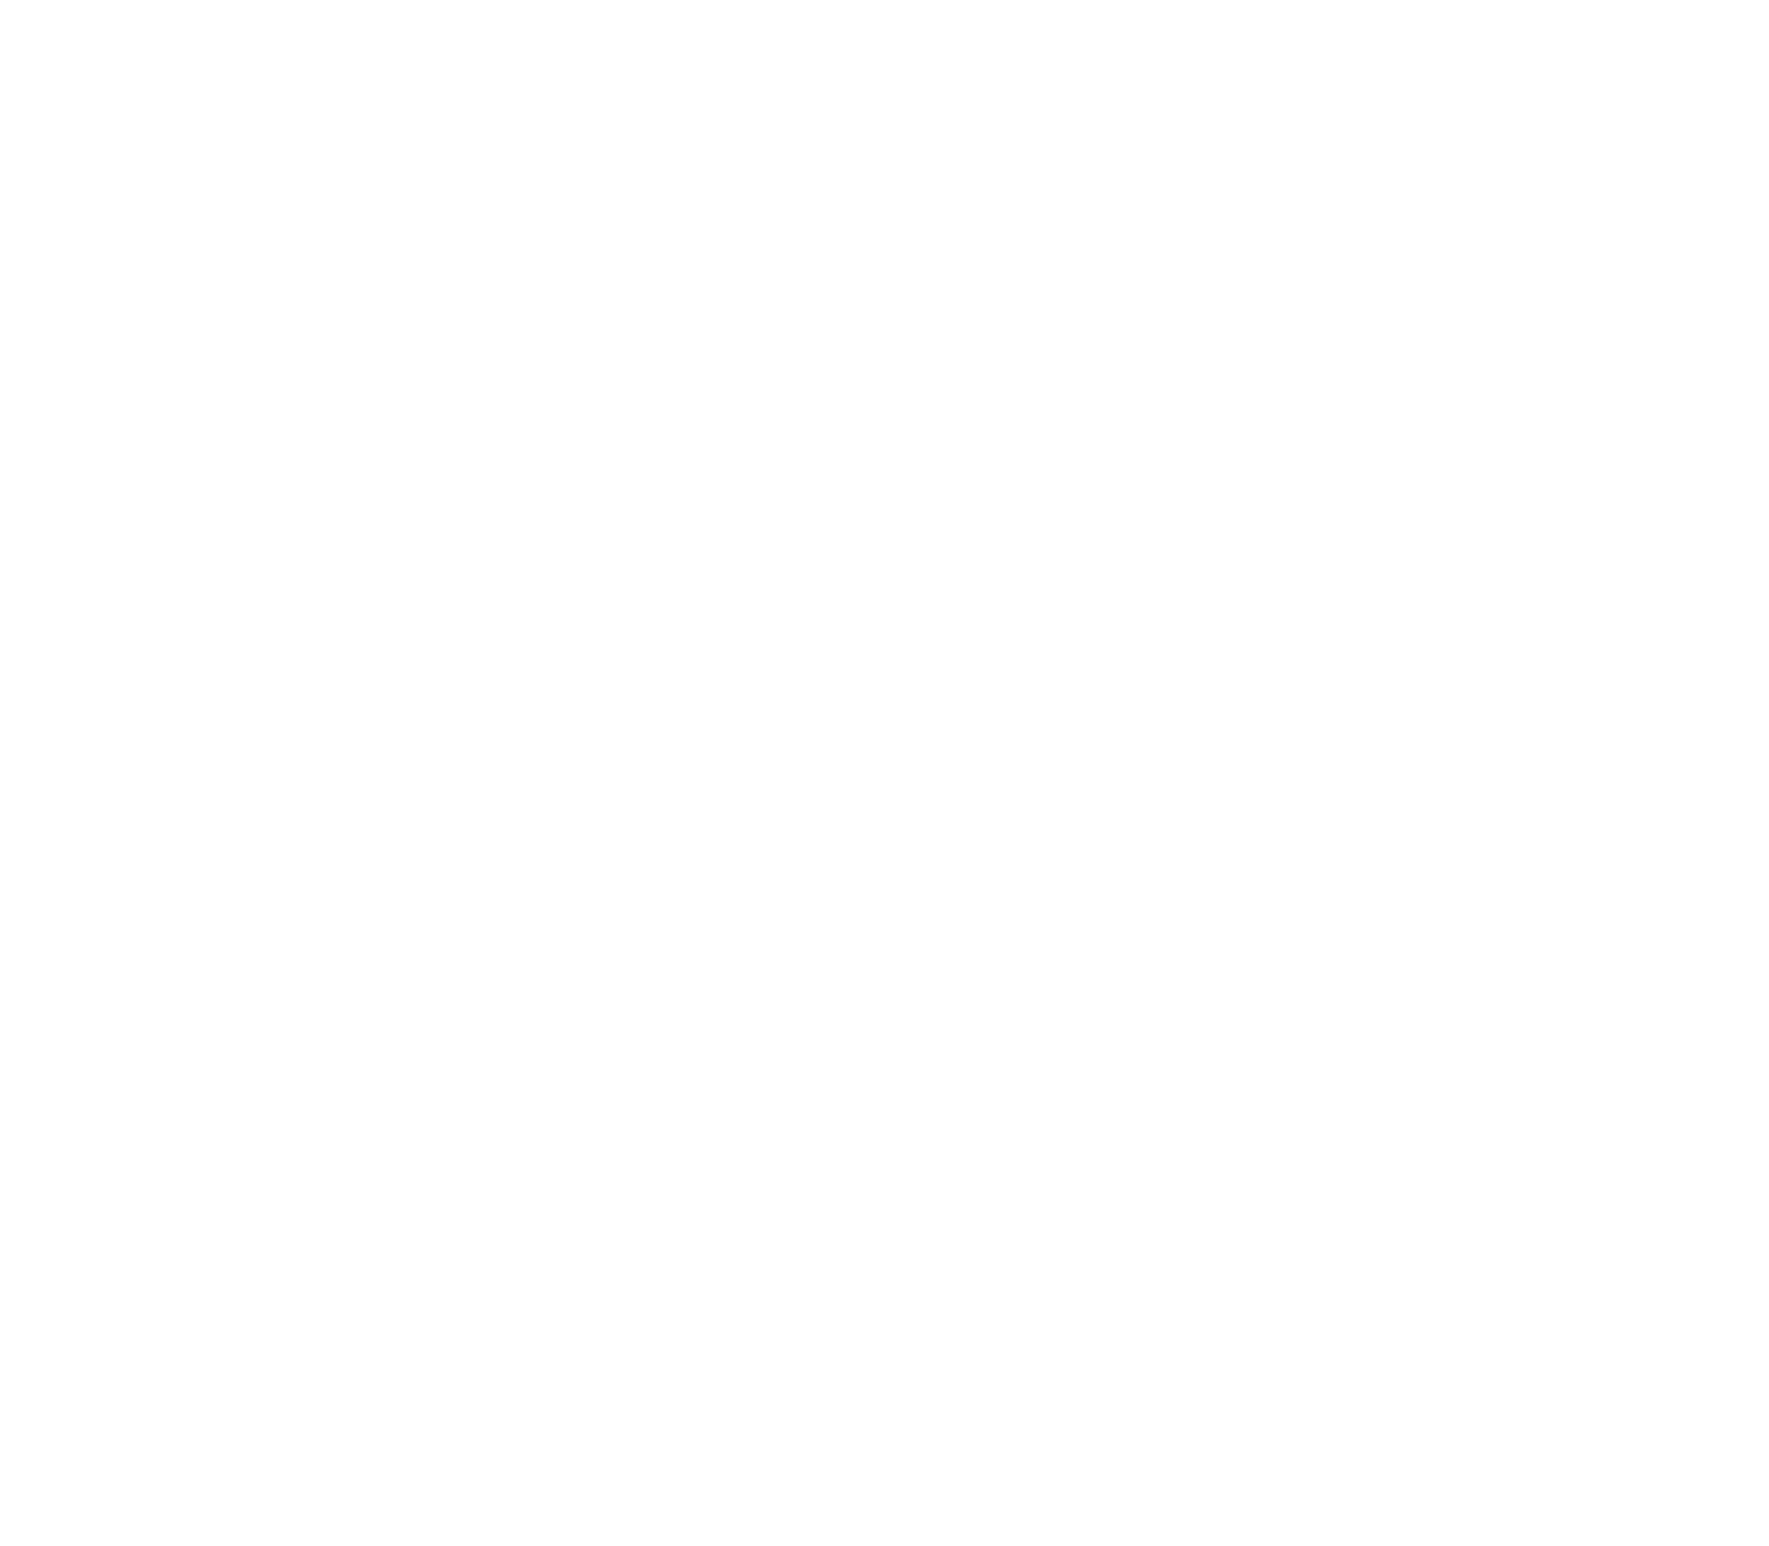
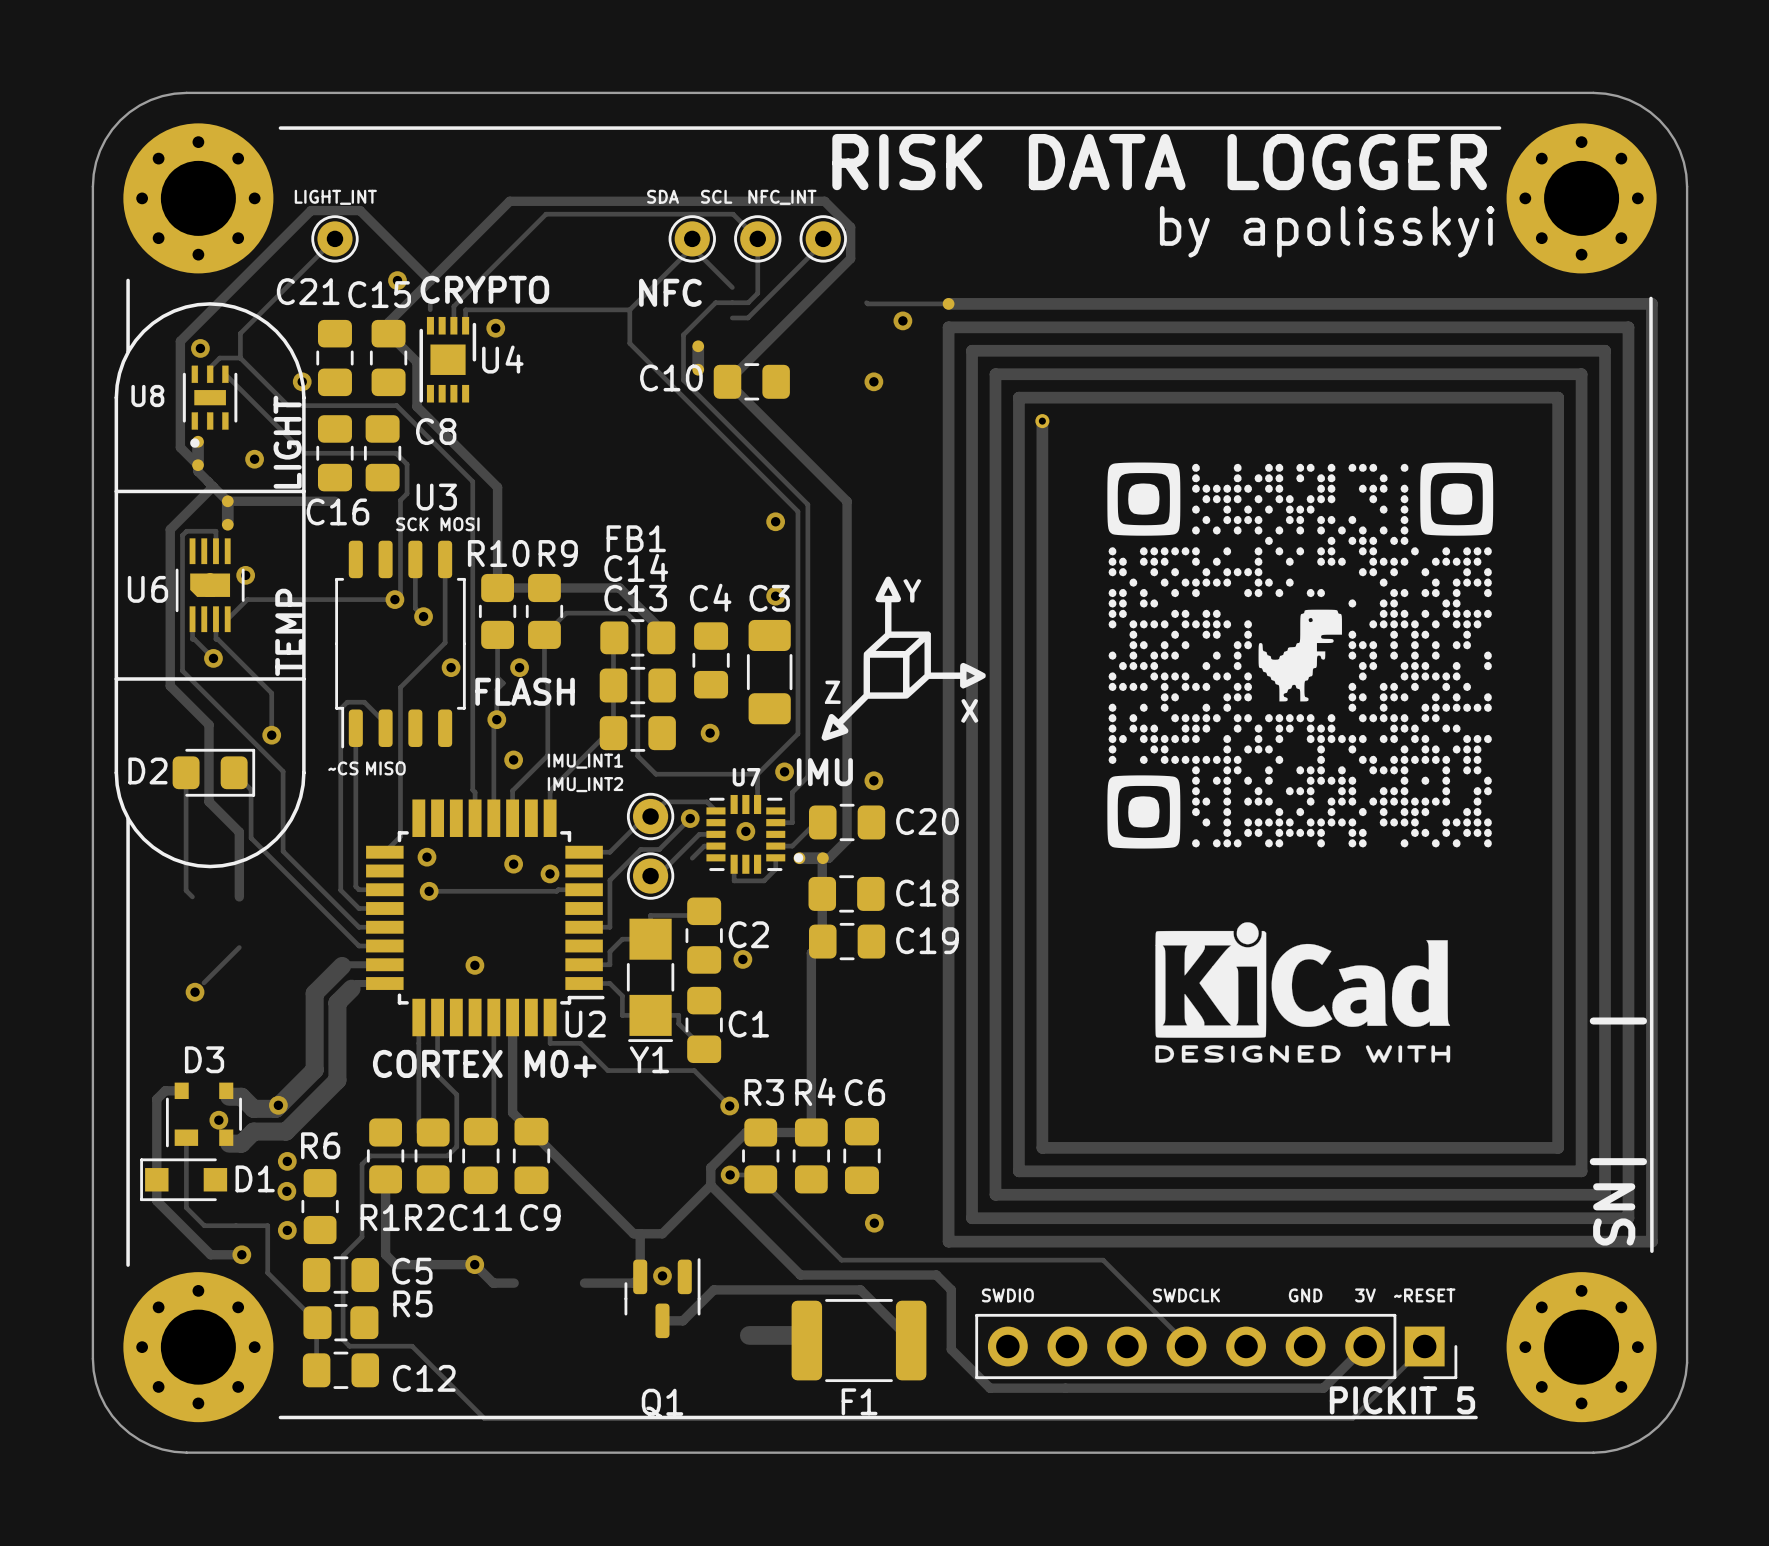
board edge: none -> (186, 92) (1593, 92) (1605, 93) (1629, 100) (1640, 105) (1659, 120) (1674, 139) (1679, 150) (1686, 174) (1687, 186) (1687, 1362) (1683, 1386) (1678, 1397) (1666, 1417) (1649, 1434) (1628, 1445) (1605, 1451) (1593, 1452) (186, 1452) (162, 1449) (150, 1445) (139, 1440) (120, 1425) (112, 1415) (100, 1394) (93, 1371) (92, 1358) (92, 186) (93, 174) (100, 150) (105, 139) (120, 120) (139, 105) (150, 100) (174, 93) (186, 92)
line: none -> (280, 128) (1499, 128)
text: none -> RISK DATA LOGGER (1159, 162)
text: none -> SDA (663, 196)
text: none -> SCL (716, 196)
part: none -> (198, 198)
text: none -> LIGHT_INT (335, 197)
text: none -> NFC_INT (782, 197)
part: none -> (1581, 198)
text: none -> by apolisskyi (1327, 231)
track: none -> (334, 238) (240, 333) (240, 358)
part: none -> (334, 238)
part: none -> (692, 238)
part: none -> (757, 238)
track: none -> (823, 238) (823, 242) (747, 317) (732, 317)
part: none -> (823, 238)
track: none -> (692, 247) (732, 287)
track: none -> (692, 247) (629, 309)
line: none -> (128, 280) (128, 350)
via: none -> (397, 280)
track: none -> (430, 280) (360, 210) (311, 210) (180, 341) (180, 447) (198, 465) (198, 471) (213, 486)
text: none -> CRYPTO (484, 289)
text: none -> NFC (670, 292)
line: none -> (1650, 298) (1651, 1251)
track: none -> (866, 302) (948, 303)
track: none -> (430, 304) (430, 309)
track: none -> (629, 309) (629, 343) (797, 511) (797, 733) (757, 774)
track: none -> (629, 309) (465, 309) (465, 325)
via: none -> (902, 320)
track: none -> (453, 325) (453, 306) (546, 214) (733, 214) (757, 238) (757, 293) (748, 302) (715, 302) (683, 334) (683, 380) (807, 504) (807, 776) (792, 792) (792, 822) (775, 822)
via: none -> (495, 328)
via: none -> (200, 348)
track: none -> (240, 358) (219, 358) (210, 367) (210, 374)
track: none -> (240, 358) (288, 405) (396, 405) (472, 481) (472, 790) (475, 792) (475, 818)
C21: none -> (334, 358)
C15: none -> (388, 358)
part: none -> (698, 358)
U4: none -> (447, 359)
track: none -> (225, 374) (304, 453) (396, 453) (407, 464) (407, 493) (400, 500) (400, 594) (394, 599) (247, 599) (227, 619)
via: none -> (302, 381)
C10: none -> (751, 381)
via: none -> (873, 381)
line: none -> (116, 397) (116, 772) (119, 797) (128, 819) (135, 829) (153, 847) (163, 853) (185, 863) (197, 865) (222, 865) (234, 863) (246, 859) (267, 847) (284, 829) (296, 808) (303, 785) (303, 397) (300, 373) (296, 361) (284, 340) (267, 323) (257, 316) (246, 311) (222, 304) (197, 304) (174, 311) (163, 316) (143, 331) (128, 350) (123, 361) (117, 385) (116, 397)
U8: none -> (210, 406)
text: none -> LIGHT (287, 442)
part: none -> (198, 453)
C16: none -> (334, 453)
C8: none -> (382, 453)
via: none -> (254, 459)
drawing: none -> [1107, 462, 1494, 849]
track: none -> (213, 486) (227, 501) (334, 501)
track: none -> (213, 486) (170, 529) (170, 686) (209, 724) (209, 801) (239, 832) (239, 896)
line: none -> (116, 491) (303, 491)
part: none -> (227, 513)
via: none -> (775, 521)
text: none -> SCK (412, 524)
text: none -> MOSI (460, 524)
track: none -> (215, 551) (215, 531) (186, 531) (182, 535) (182, 670) (283, 771) (283, 851) (359, 927) (384, 927)
track: none -> (415, 559) (415, 608) (423, 616)
track: none -> (445, 559) (445, 642) (400, 687) (400, 836) (384, 852)
via: none -> (245, 575)
drawing: none -> [821, 576, 986, 741]
U6: none -> (210, 585)
via: none -> (775, 596)
via: none -> (394, 599)
R10: none -> (497, 611)
R9: none -> (544, 611)
via: none -> (423, 616)
track: none -> (192, 619) (192, 639) (213, 658)
track: none -> (215, 619) (215, 639) (271, 693) (271, 735)
track: none -> (497, 634) (497, 677) (503, 683) (496, 689) (496, 719) (493, 722) (493, 818)
track: none -> (614, 637) (613, 727) (550, 790) (550, 818)
FB1: none -> (637, 637)
track: none -> (661, 637) (663, 631) (619, 588) (497, 588) (497, 487) (416, 406) (416, 362) (388, 333) (388, 322) (509, 201) (824, 201) (850, 227) (850, 258) (727, 381) (847, 501) (847, 839) (828, 858) (822, 858) (822, 941) (811, 952) (811, 1132) (746, 1132) (710, 1167) (710, 1185)
text: none -> TEMP (289, 632)
U3: none -> (400, 644)
via: none -> (213, 658)
C4: none -> (711, 660)
via: none -> (451, 667)
via: none -> (519, 667)
C3: none -> (769, 672)
line: none -> (116, 678) (303, 678)
C14: none -> (637, 685)
text: none -> FLASH (525, 691)
via: none -> (496, 719)
track: none -> (355, 728) (355, 886) (359, 889) (384, 889)
track: none -> (385, 728) (385, 723) (364, 702) (347, 702) (340, 708) (340, 890) (359, 908) (384, 908)
C13: none -> (637, 733)
via: none -> (710, 733)
via: none -> (271, 735)
via: none -> (513, 759)
text: none -> IMU_INT1 (585, 761)
text: none -> ~CS (343, 768)
text: none -> MISO (385, 768)
via: none -> (784, 771)
track: none -> (186, 772) (186, 890) (192, 896)
D2: none -> (213, 772)
track: none -> (234, 772) (251, 789) (251, 838) (359, 946) (384, 946)
text: none -> IMU (824, 772)
part: none -> (1300, 772)
track: none -> (757, 774) (757, 804)
track: none -> (757, 774) (655, 774) (637, 756) (637, 624) (626, 613) (566, 613) (544, 634) (544, 679) (547, 683) (547, 755) (512, 790) (512, 818)
via: none -> (873, 780)
text: none -> IMU_INT2 (585, 784)
track: none -> (715, 810) (706, 801) (665, 801) (650, 816) (645, 816) (609, 852) (584, 852)
part: none -> (650, 816)
track: none -> (690, 818) (659, 849) (640, 849) (609, 880) (609, 927) (584, 927)
via: none -> (690, 818)
line: none -> (128, 819) (128, 1265)
track: none -> (822, 822) (815, 822) (792, 846) (775, 846)
C20: none -> (847, 822)
via: none -> (745, 831)
track: none -> (715, 834) (699, 834) (657, 876) (650, 876)
U7: none -> (754, 834)
track: none -> (715, 846) (704, 846) (692, 858)
via: none -> (426, 857)
track: none -> (775, 857) (775, 869) (764, 880) (734, 880) (734, 864)
part: none -> (811, 858)
via: none -> (513, 864)
via: none -> (550, 873)
part: none -> (650, 876)
track: none -> (584, 889) (429, 891)
via: none -> (429, 891)
C18: none -> (846, 893)
track: none -> (704, 911) (699, 915) (650, 915) (650, 939) (622, 939) (609, 951) (609, 964) (584, 964)
U2: none -> (485, 917)
drawing: none -> [1155, 922, 1451, 1063]
C2: none -> (704, 935)
C19: none -> (847, 941)
track: none -> (239, 947) (203, 982)
via: none -> (742, 959)
track: none -> (386, 964) (343, 964) (314, 993) (314, 1069) (275, 1108) (253, 1108) (241, 1096) (229, 1096)
via: none -> (474, 965)
Y1: none -> (650, 980)
track: none -> (386, 983) (356, 983) (337, 1002) (337, 1080) (286, 1131) (253, 1131) (241, 1143) (229, 1143) (229, 1133)
track: none -> (584, 983) (609, 983) (622, 995) (622, 1015) (678, 1015) (678, 1023) (704, 1049)
via: none -> (195, 992)
track: none -> (418, 1017) (418, 1132)
track: none -> (437, 1017) (437, 1075) (456, 1094) (456, 1146) (447, 1155) (370, 1155) (362, 1164) (362, 1236) (343, 1255) (343, 1339) (349, 1346) (412, 1346) (484, 1418) (1352, 1418) (1424, 1346)
track: none -> (493, 1017) (493, 1118) (480, 1131)
track: none -> (512, 1017) (512, 1112) (633, 1233) (662, 1233) (710, 1185)
track: none -> (550, 1017) (550, 1043) (580, 1043) (607, 1070) (694, 1070) (729, 1106)
C1: none -> (704, 1024)
text: none -> CORTEX M0+ (484, 1063)
track: none -> (181, 1090) (165, 1090) (156, 1099) (156, 1200) (210, 1254) (241, 1254)
via: none -> (278, 1105)
via: none -> (729, 1106)
D3: none -> (203, 1114)
via: none -> (218, 1120)
track: none -> (186, 1137) (186, 1207) (204, 1225) (267, 1225) (267, 1272) (317, 1322) (316, 1370)
text: none -> SN| | (1618, 1131)
R1: none -> (385, 1155)
R2: none -> (433, 1155)
C11: none -> (480, 1155)
C9: none -> (531, 1155)
R3: none -> (760, 1155)
R4: none -> (811, 1155)
C6: none -> (861, 1155)
via: none -> (287, 1161)
track: none -> (730, 1174) (756, 1174) (841, 1260) (1103, 1260) (1186, 1343) (1186, 1346)
via: none -> (730, 1174)
D1: none -> (183, 1179)
track: none -> (385, 1179) (385, 1254) (395, 1264) (474, 1264) (493, 1283) (514, 1283)
track: none -> (710, 1185) (800, 1275) (936, 1275) (951, 1289) (951, 1349) (990, 1388) (1323, 1388) (1365, 1346)
via: none -> (286, 1191)
R6: none -> (320, 1206)
via: none -> (874, 1223)
via: none -> (287, 1230)
track: none -> (640, 1233) (640, 1276) (633, 1283) (584, 1283)
via: none -> (241, 1254)
via: none -> (474, 1264)
C5: none -> (340, 1275)
via: none -> (662, 1275)
text: none -> SWDIO (1007, 1295)
text: none -> SWDCLK (1186, 1295)
text: none -> GND (1305, 1295)
text: none -> 3V (1365, 1295)
text: none -> ~RESET (1424, 1295)
Q1: none -> (662, 1298)
track: none -> (662, 1320) (682, 1320) (713, 1289) (860, 1289) (911, 1340)
R5: none -> (340, 1322)
track: none -> (749, 1335) (801, 1335) (806, 1340)
F1: none -> (859, 1340)
part: none -> (1216, 1346)
part: none -> (198, 1347)
part: none -> (1581, 1347)
C12: none -> (340, 1370)
text: none -> PICKIT 5 (1402, 1400)
line: none -> (280, 1417) (1476, 1417)

